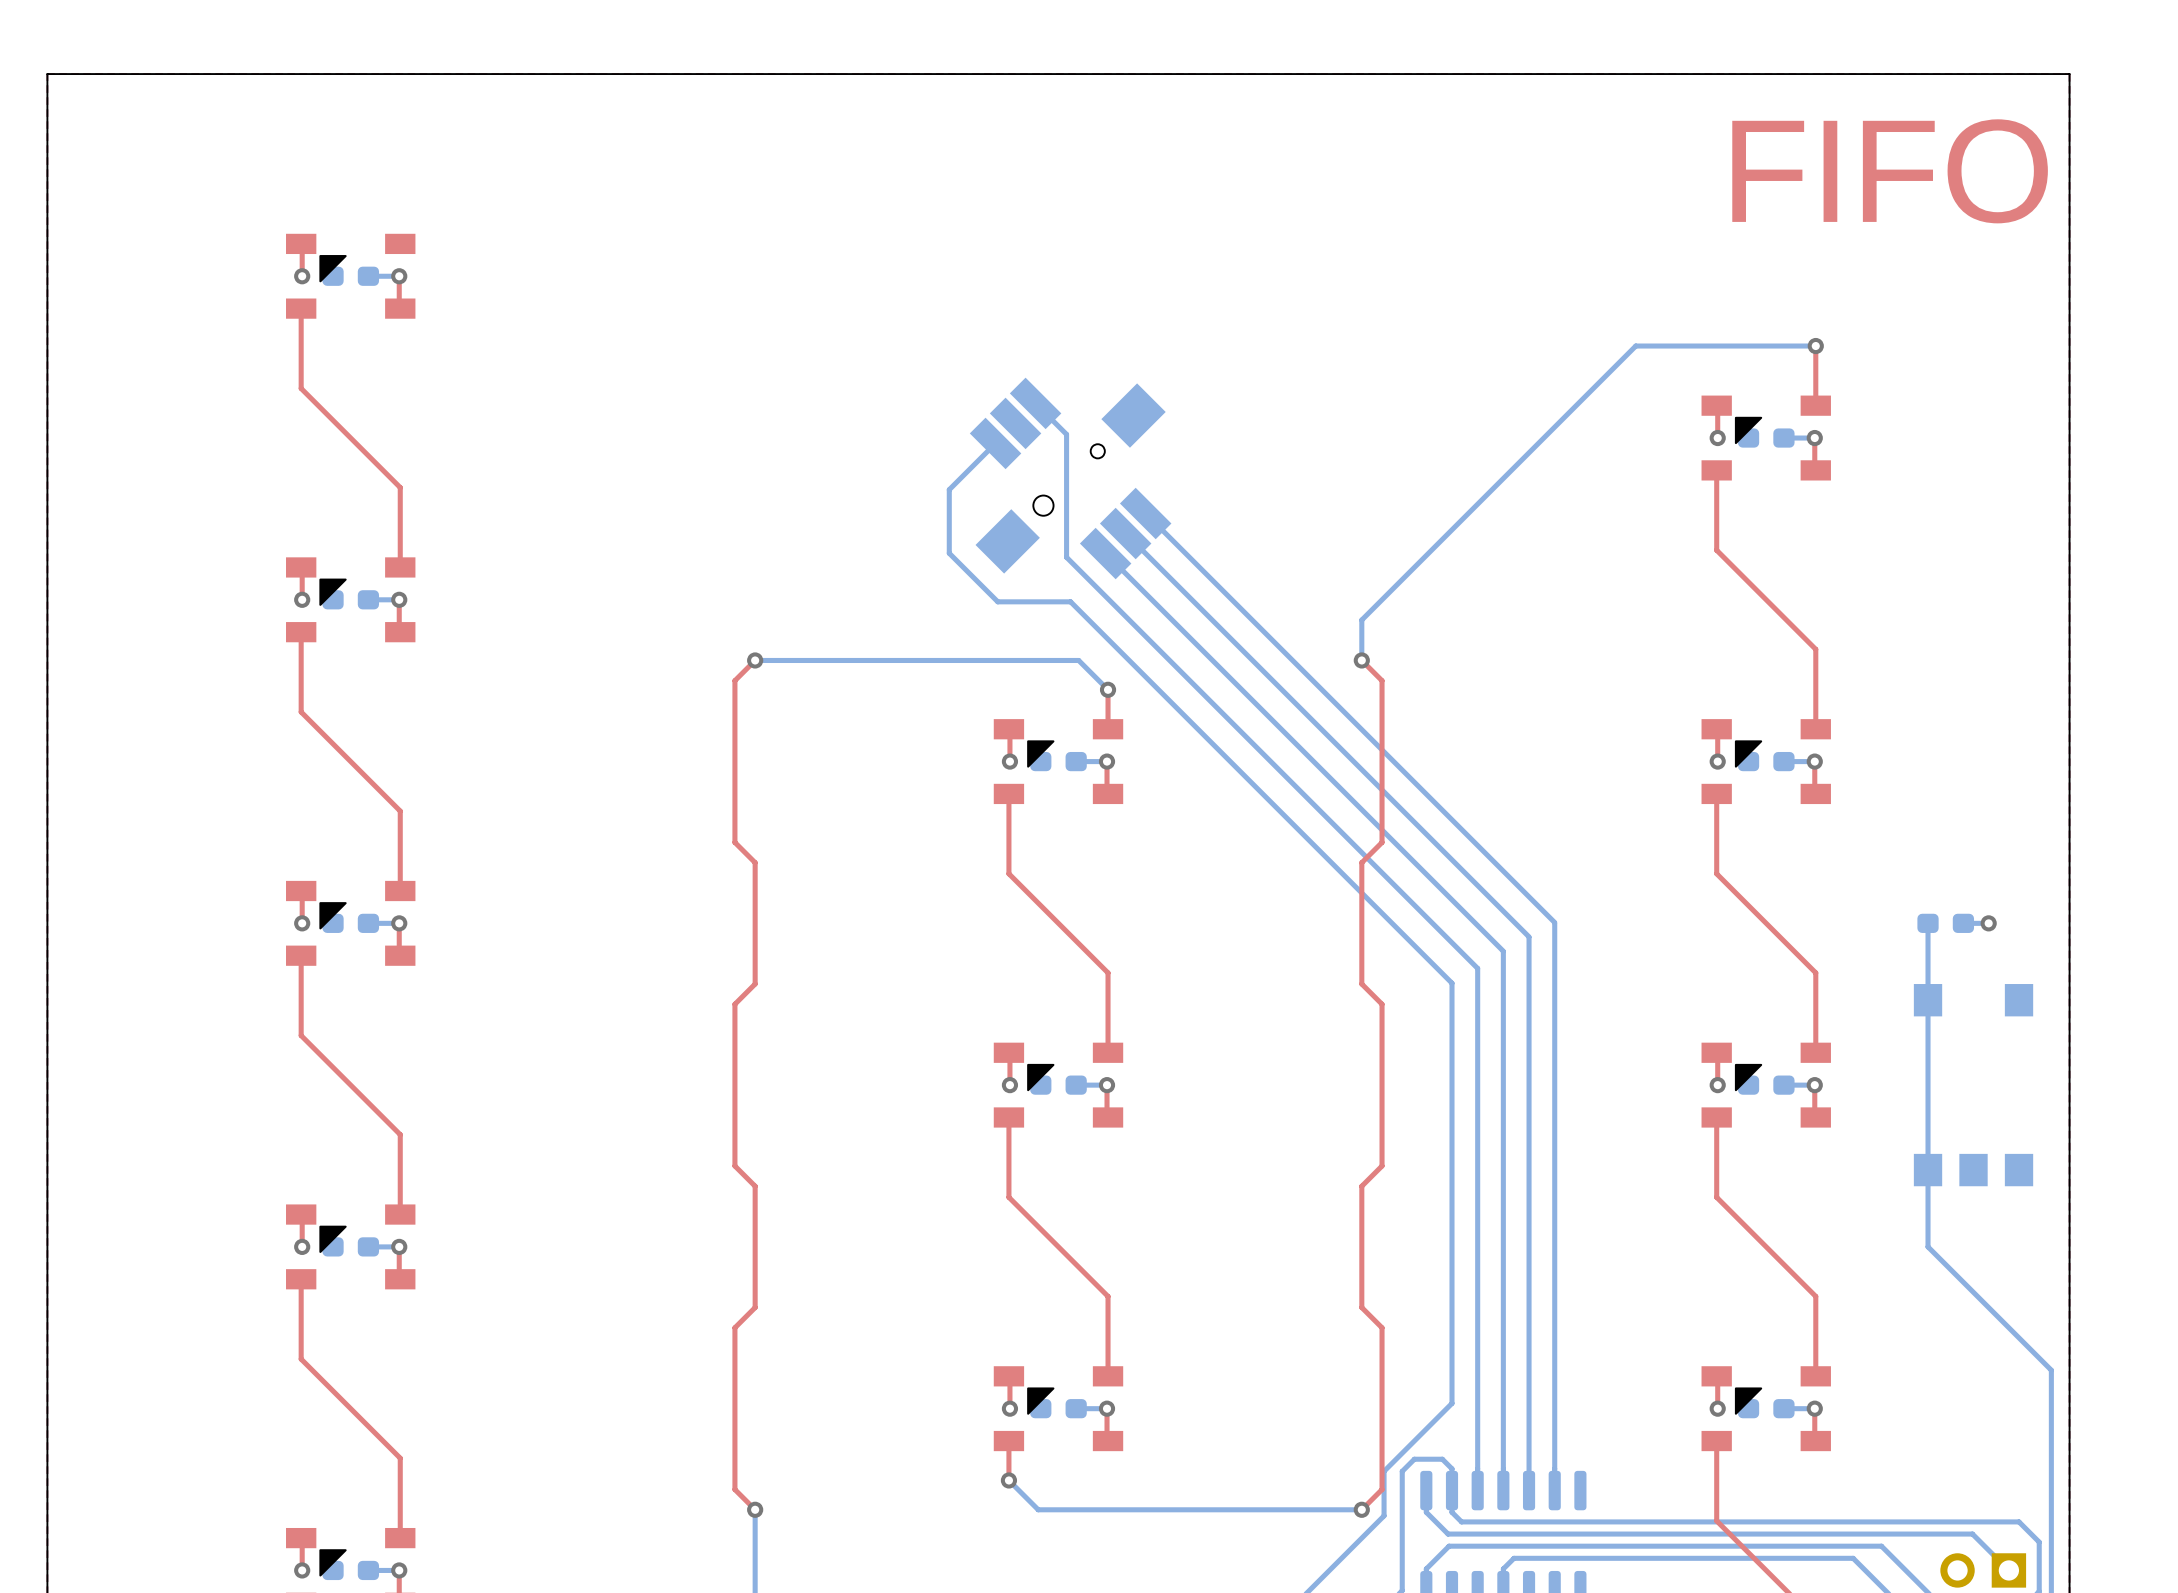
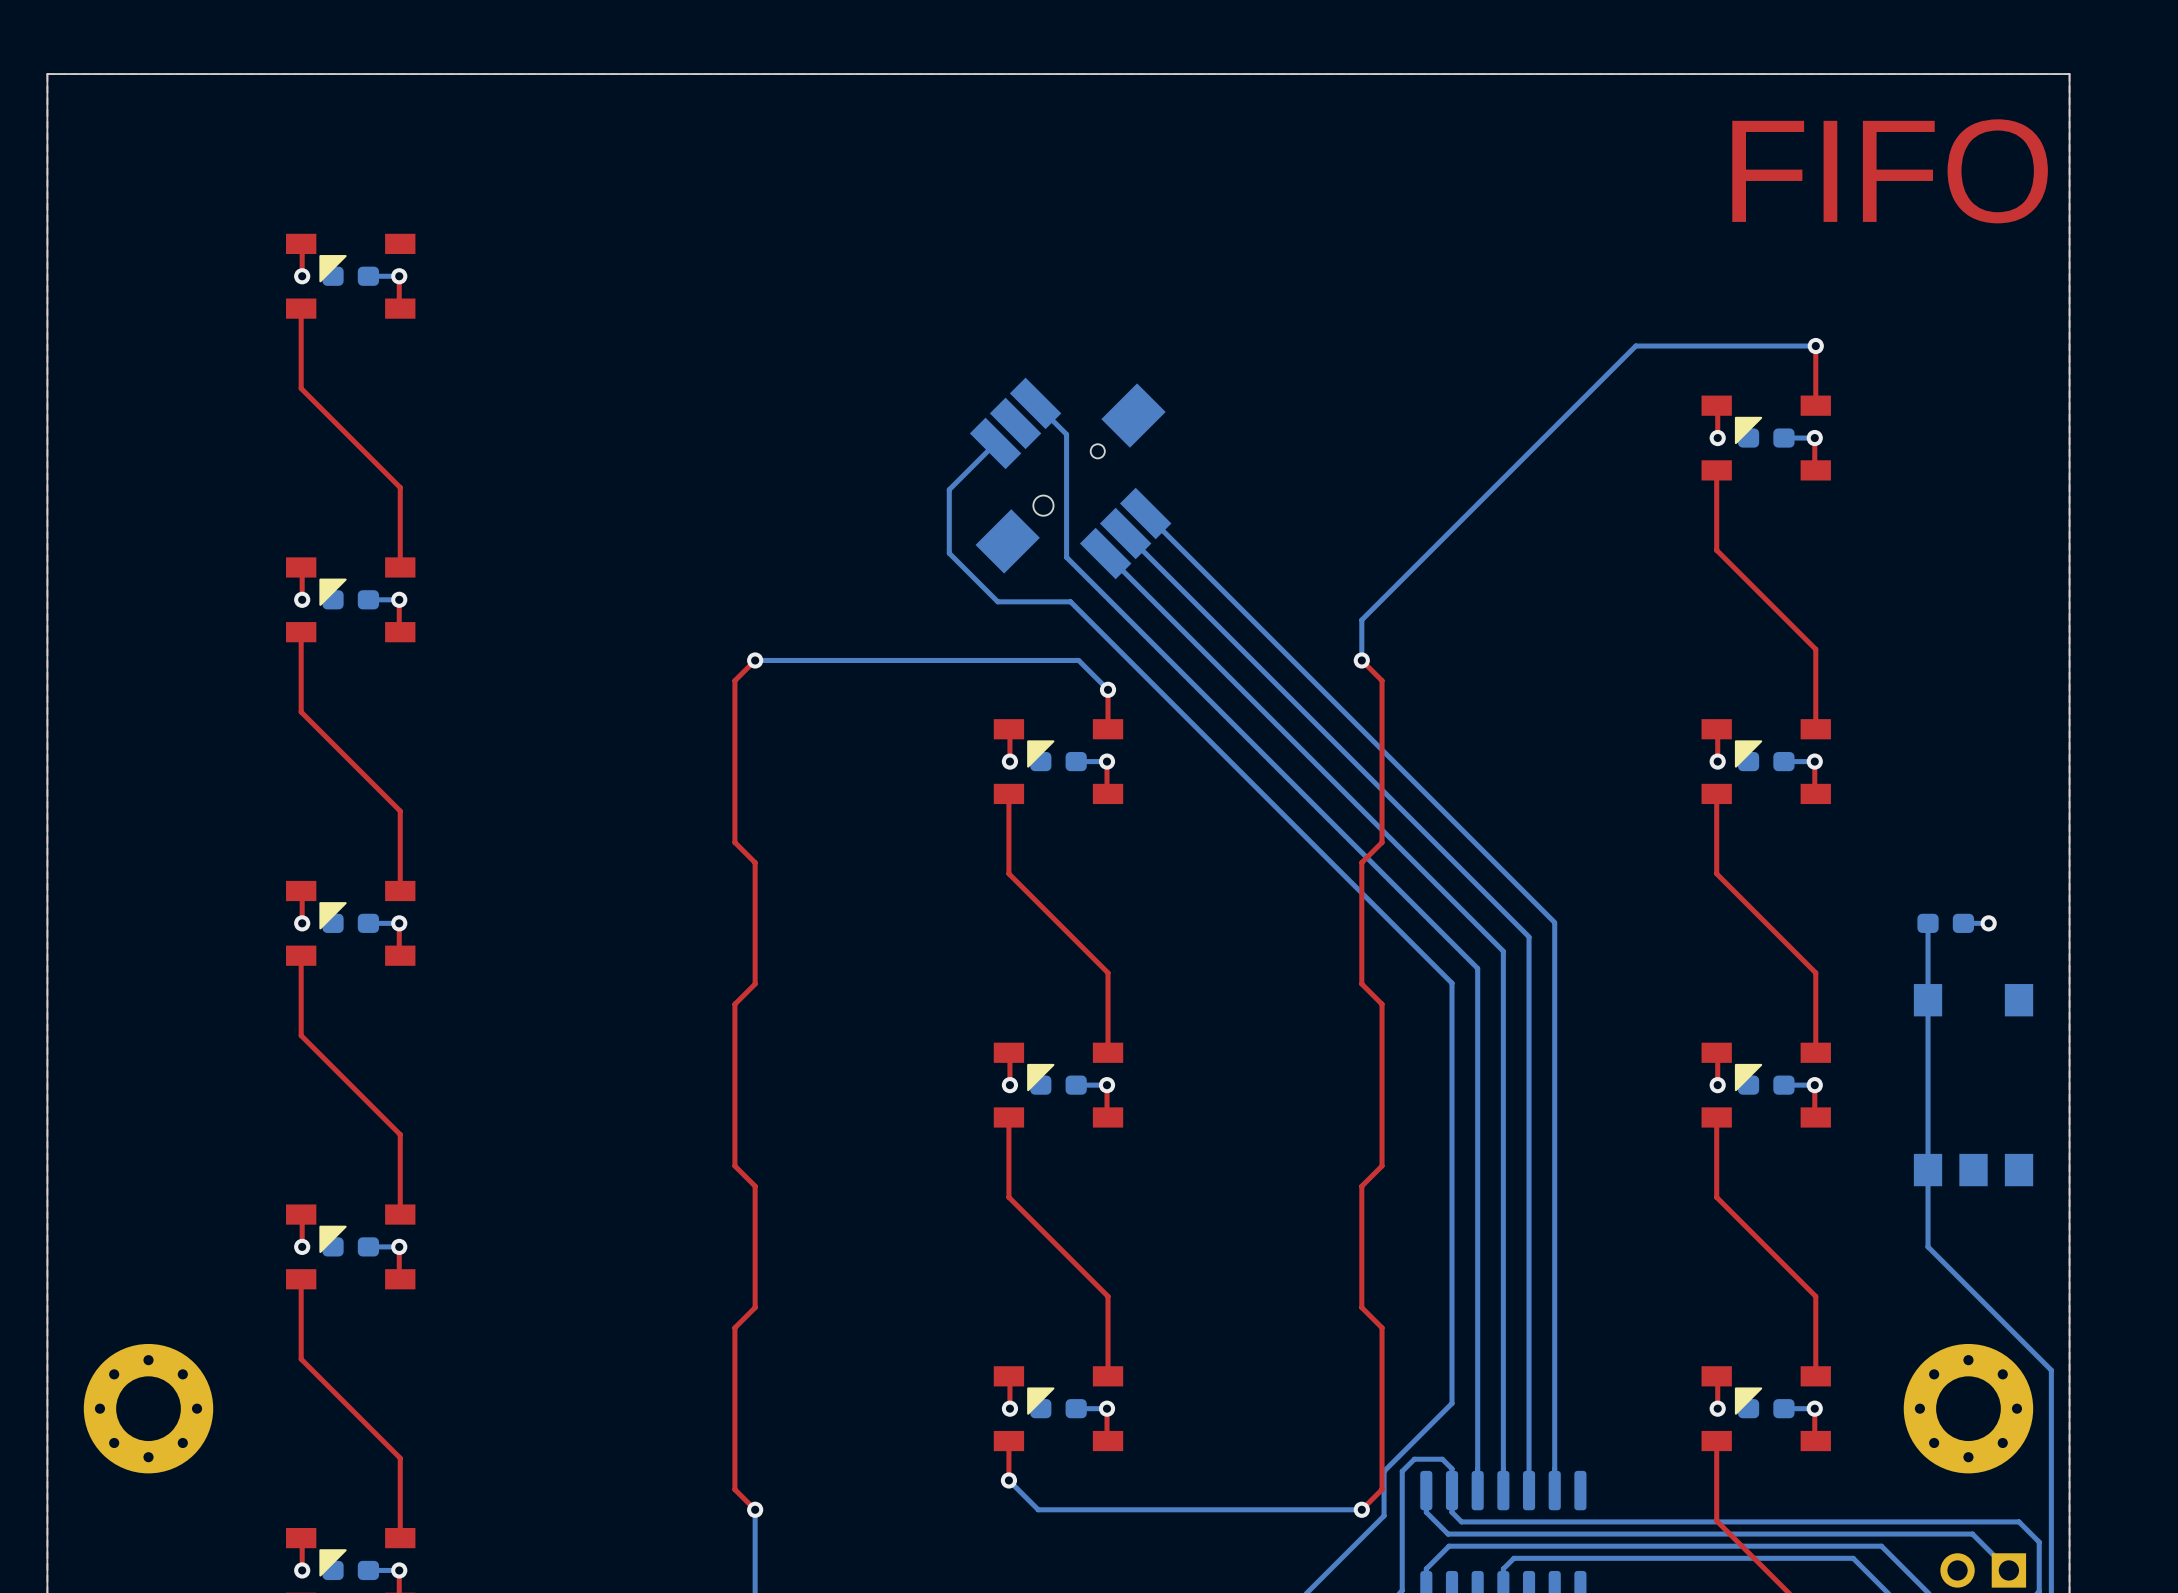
part: none -> (148, 1408)
part: none -> (1968, 1408)

